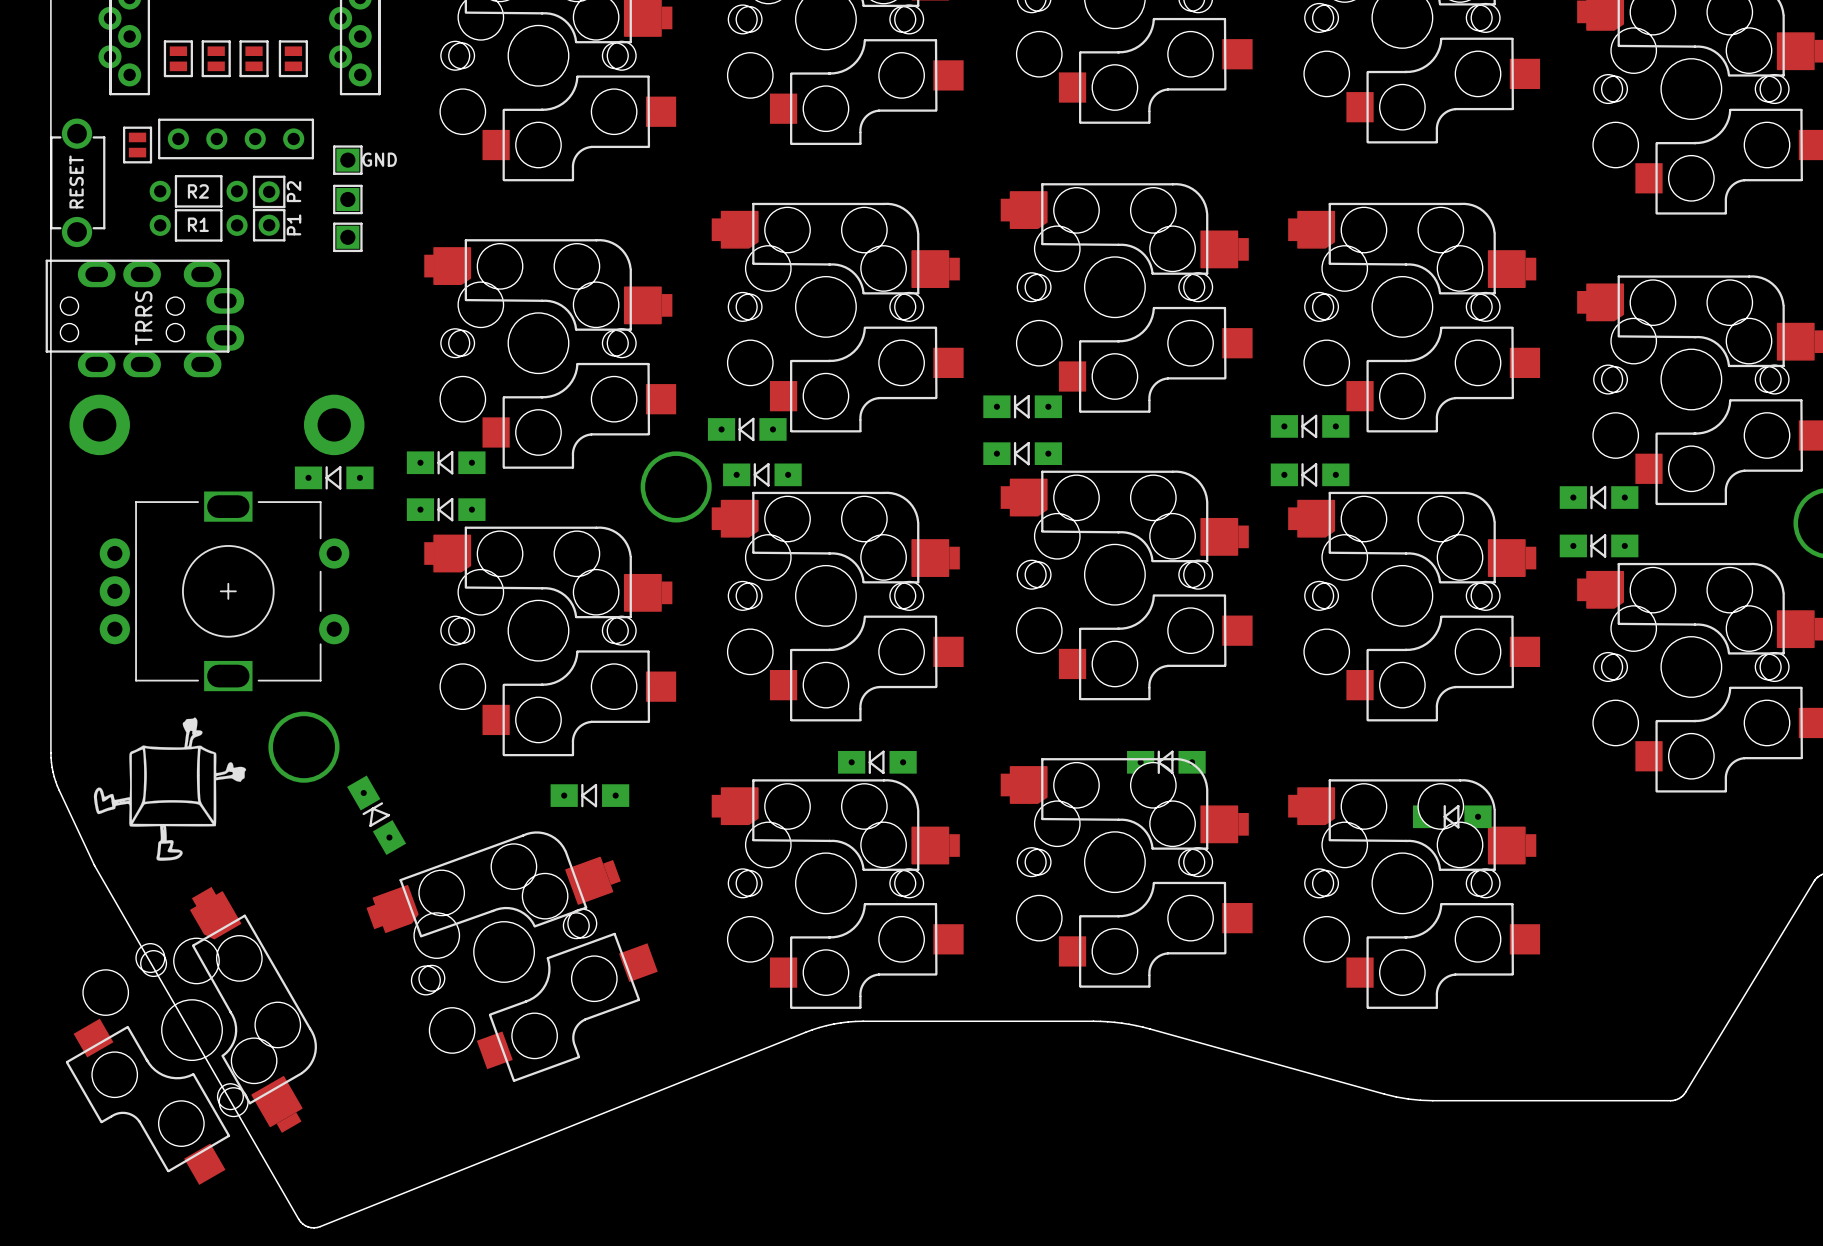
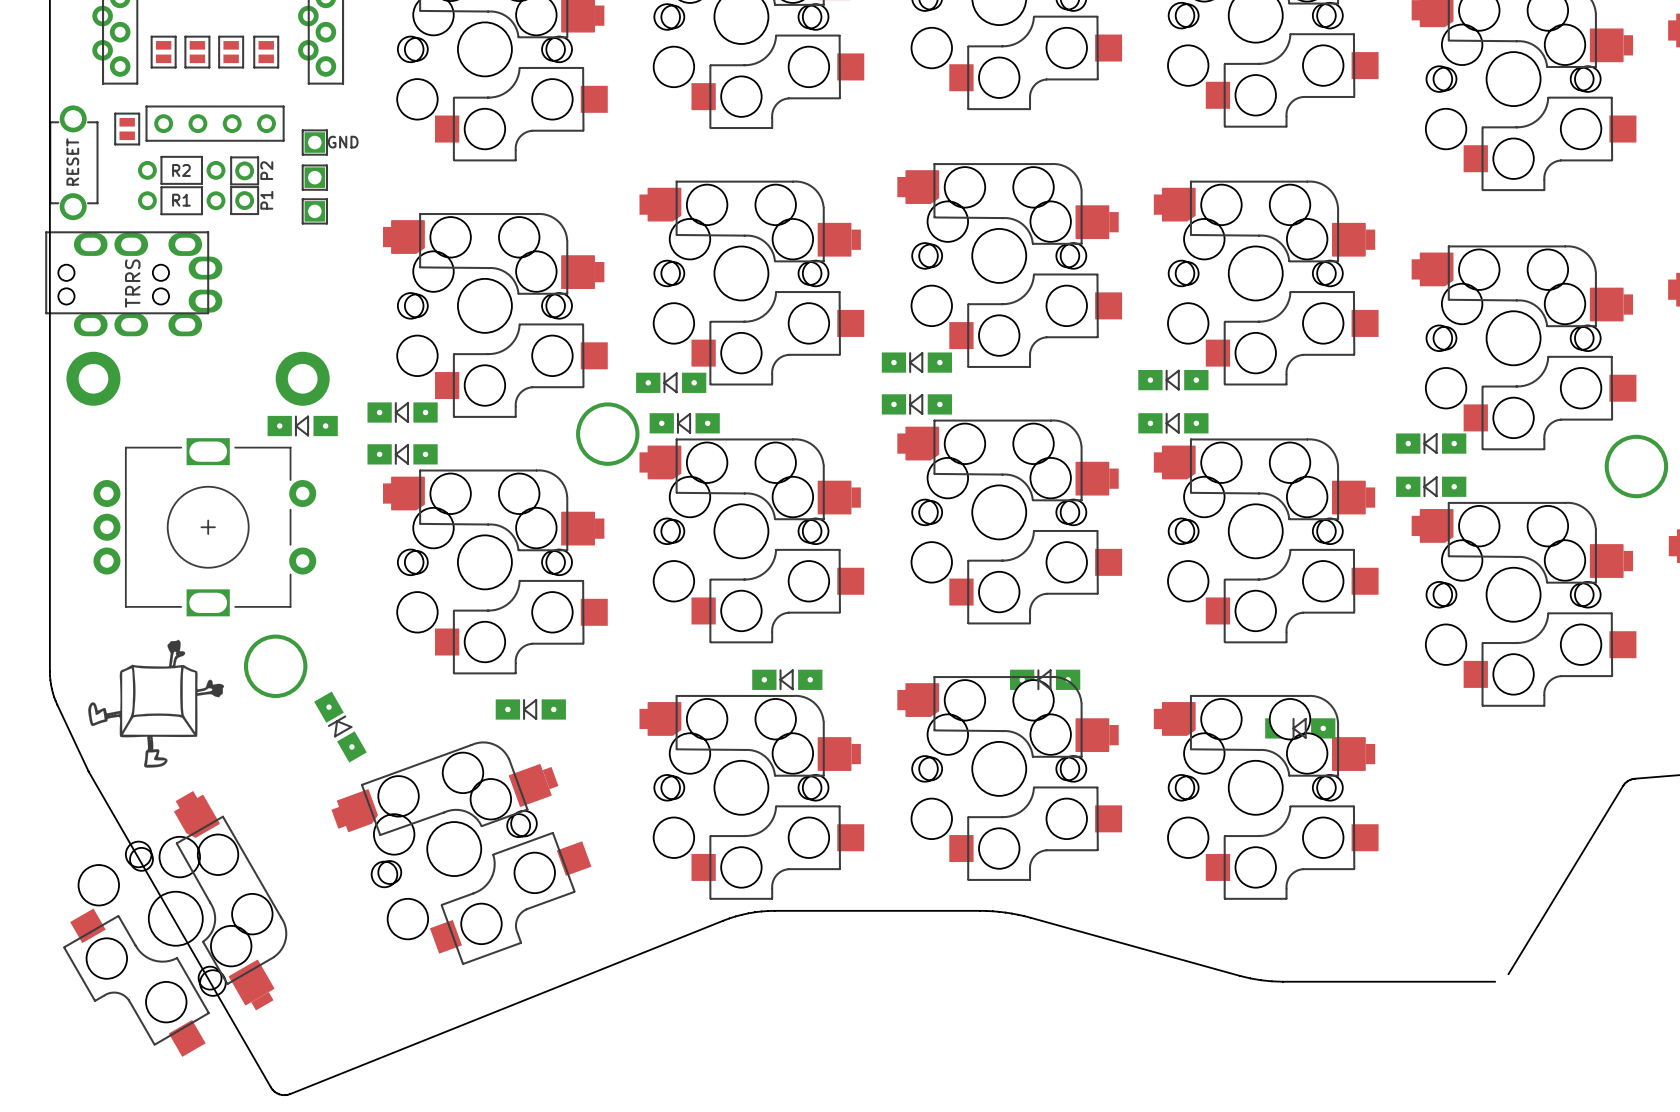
board edge: (1685, 1092) (1679, 1098) (1670, 1100) -> none

